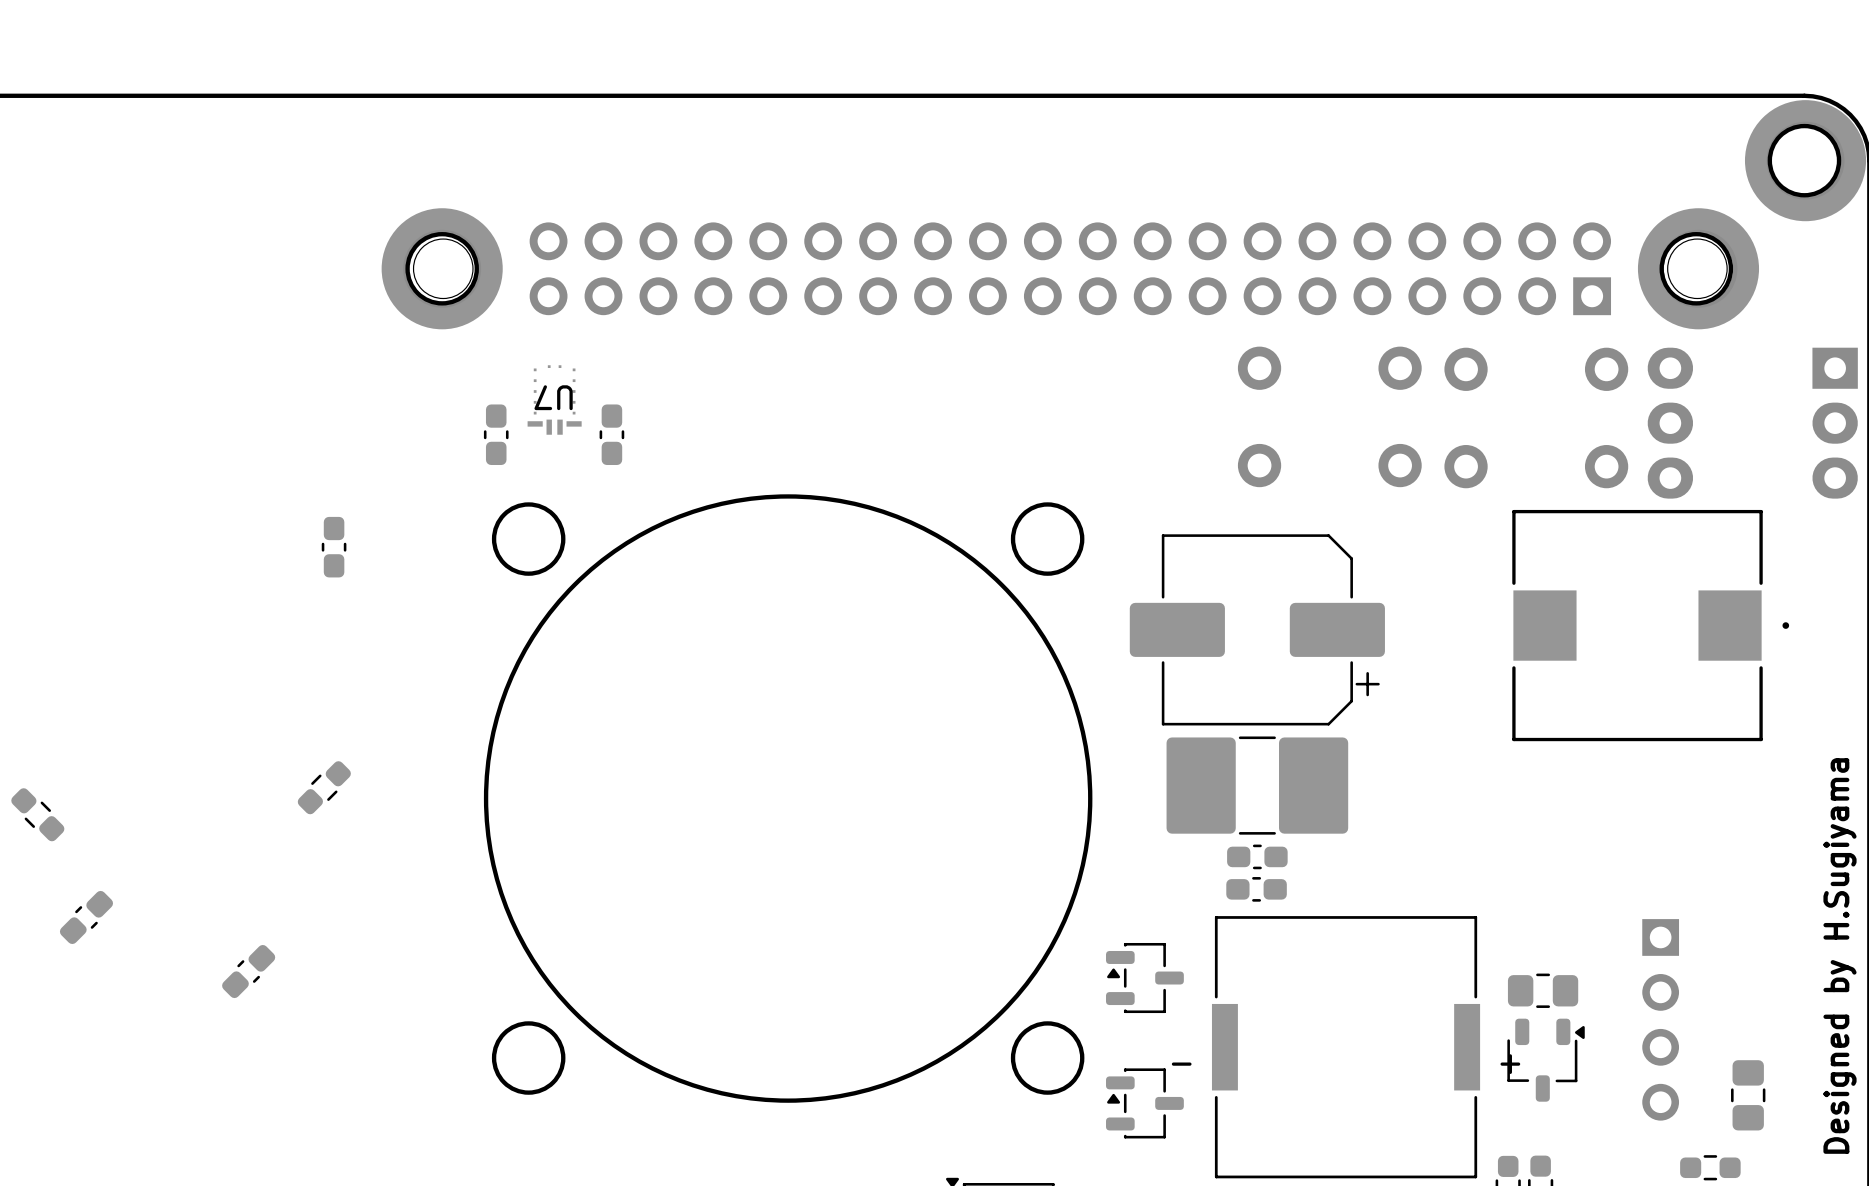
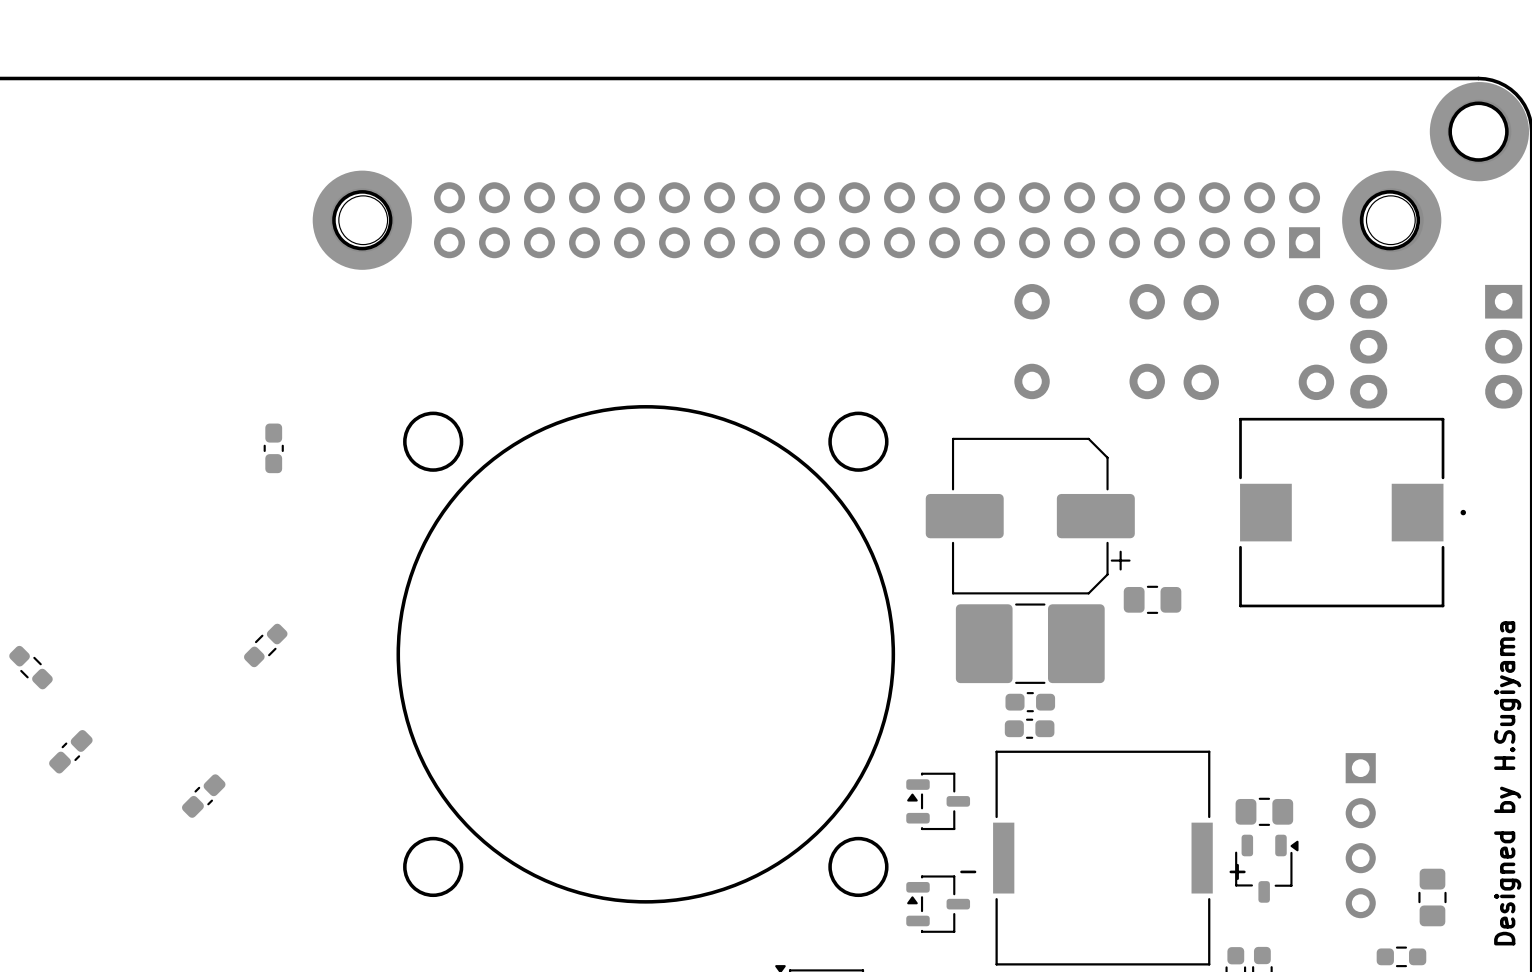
U7: (554, 399) -> none
part: (496, 434) -> none
part: (611, 434) -> none
part: none -> (1152, 599)

